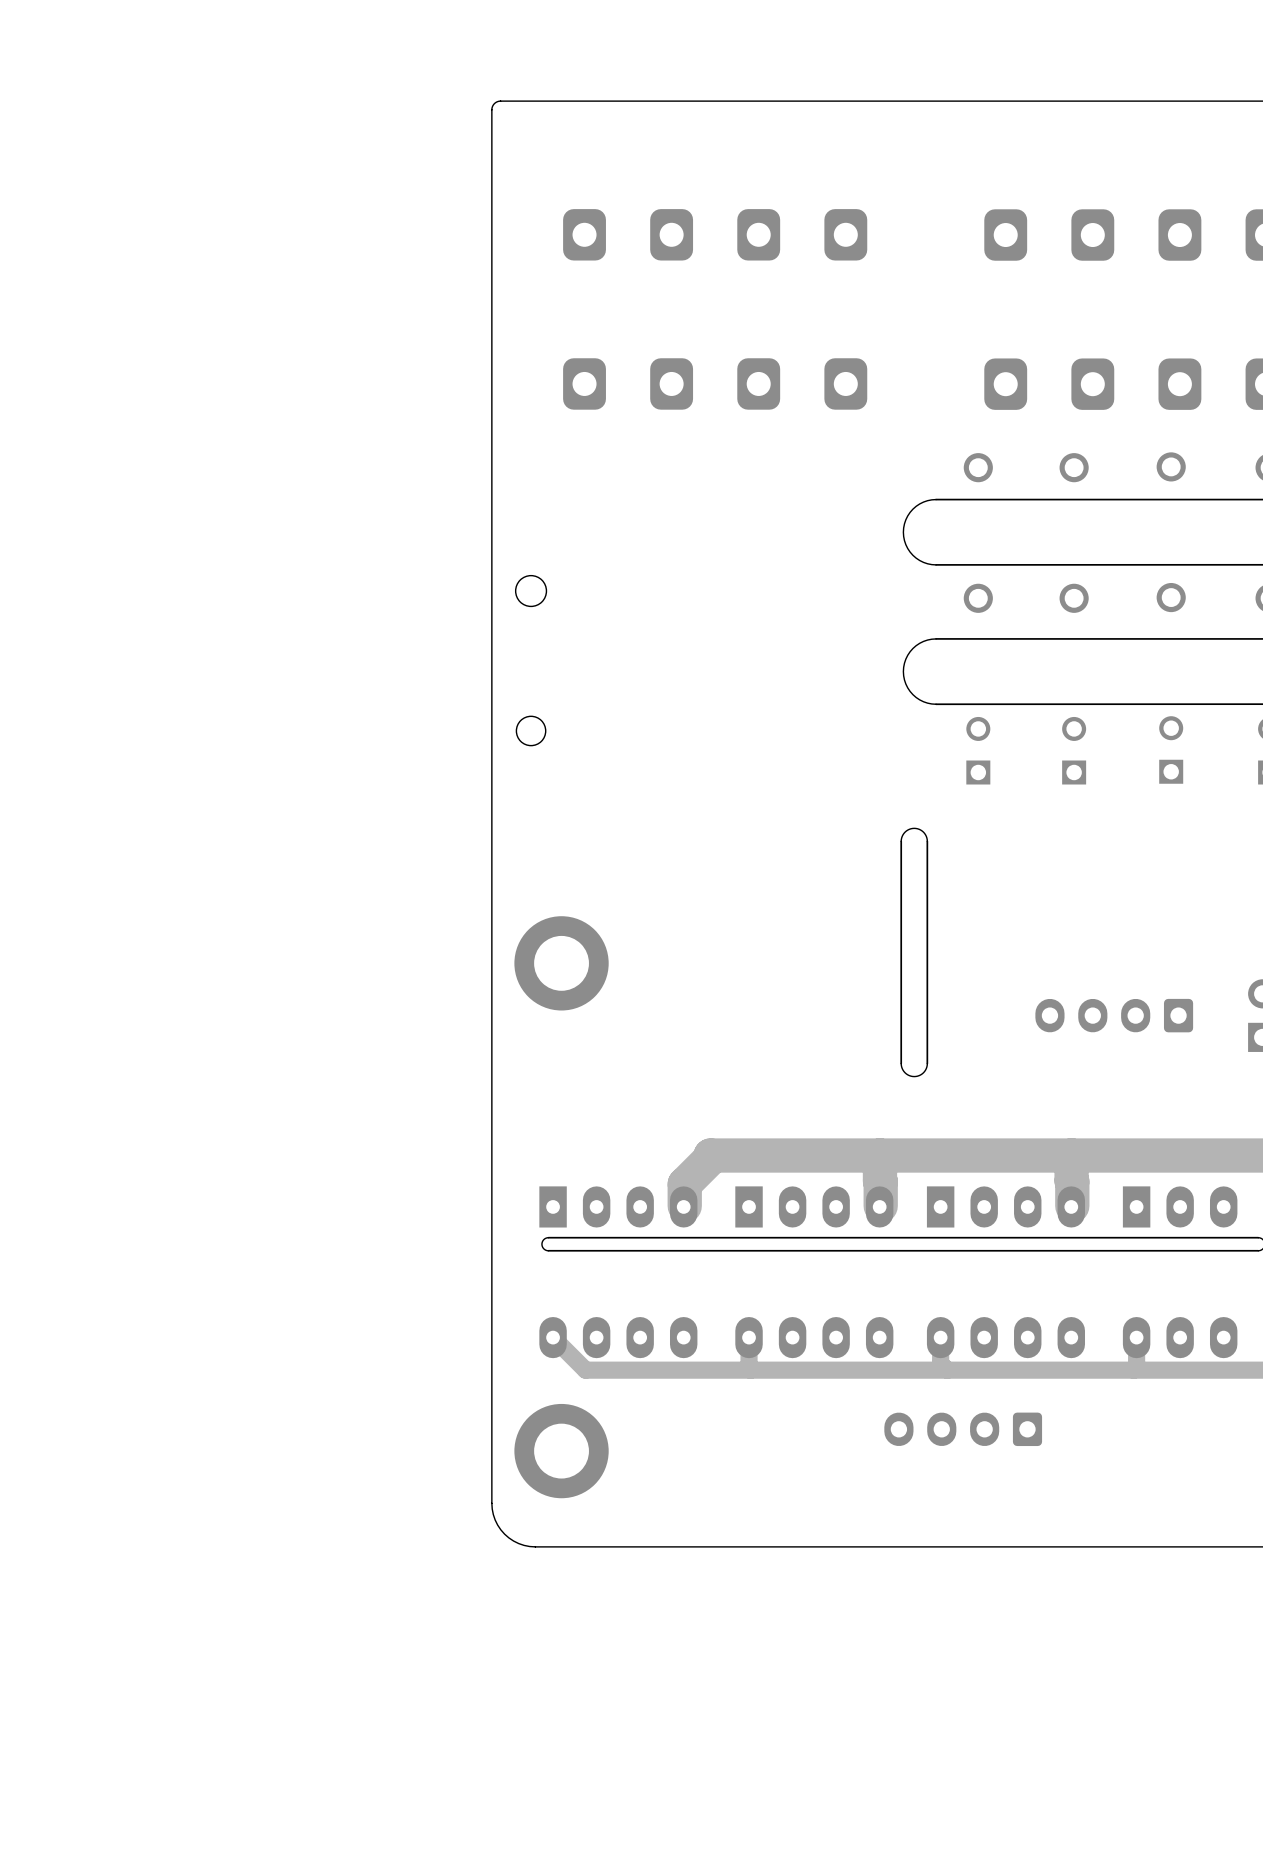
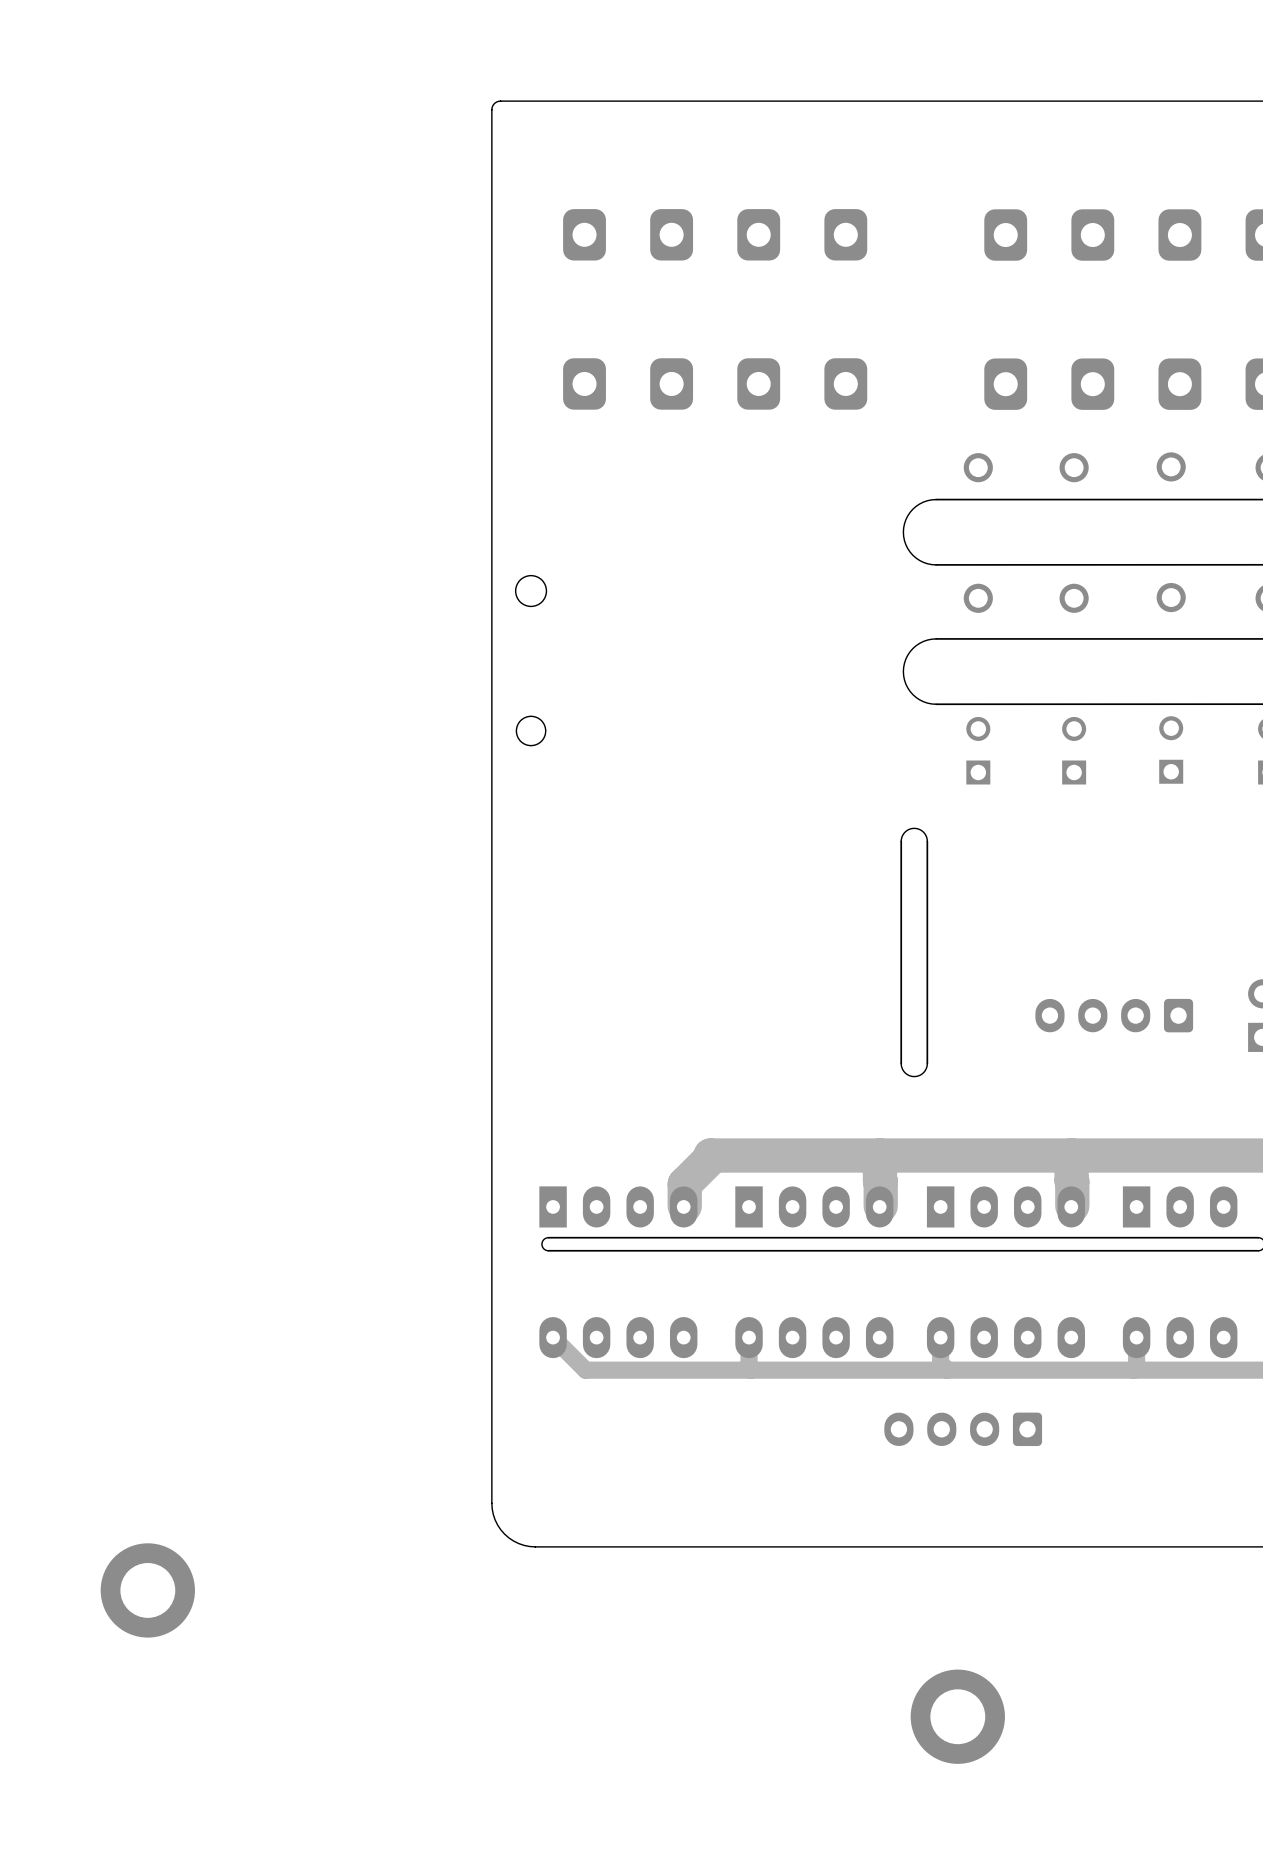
part: (561, 963) -> none
part: (561, 1451) -> none
part: none -> (147, 1590)
part: none -> (957, 1716)

